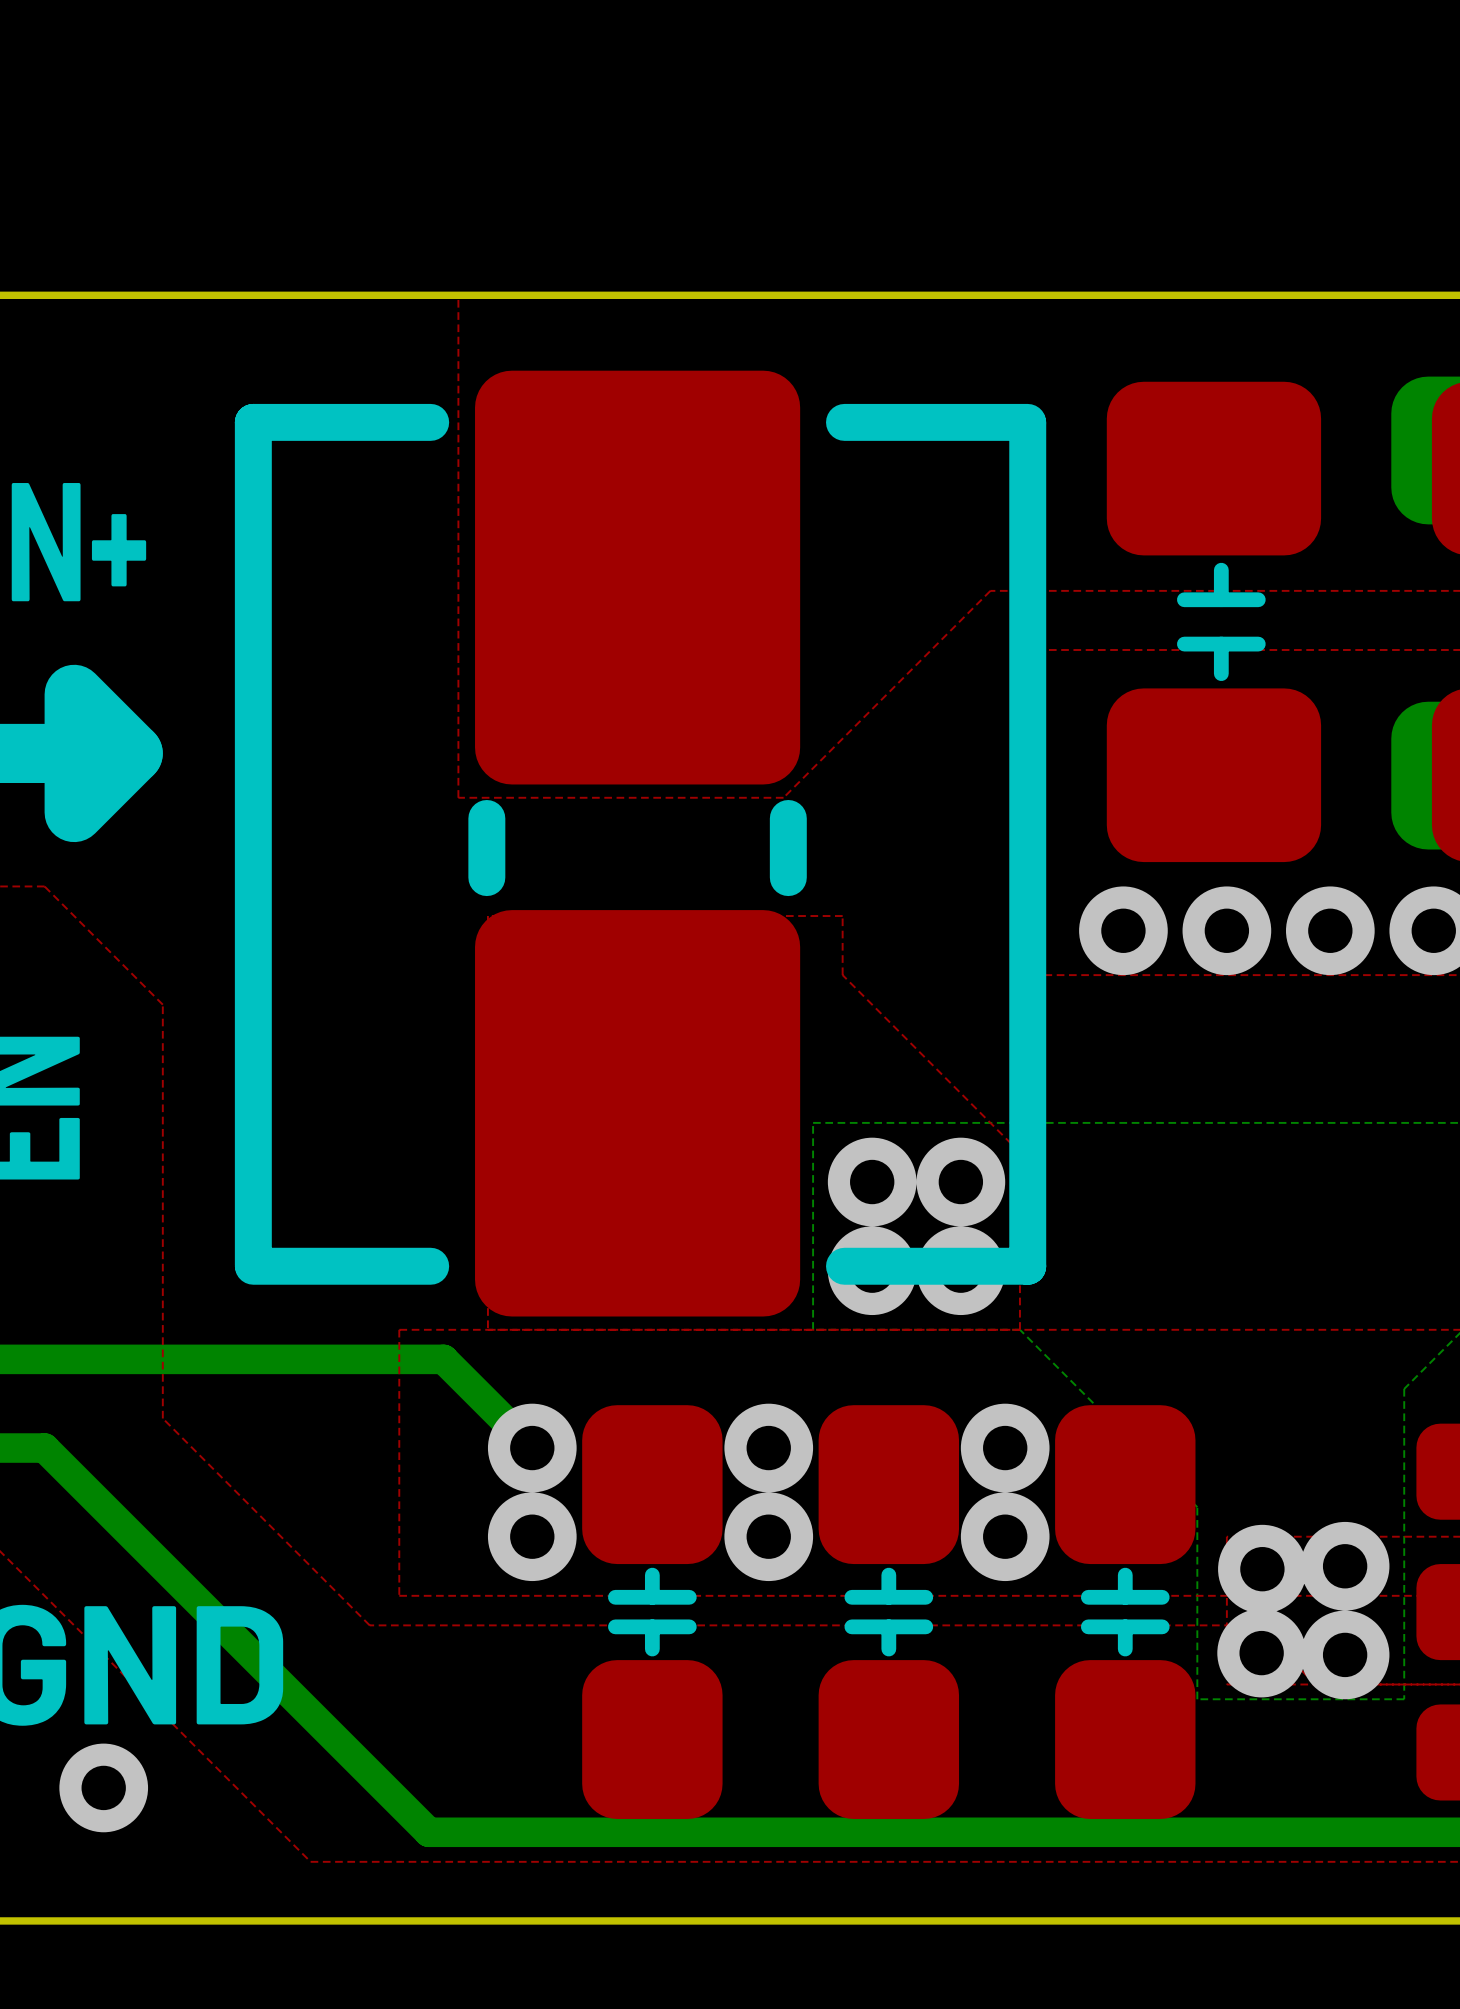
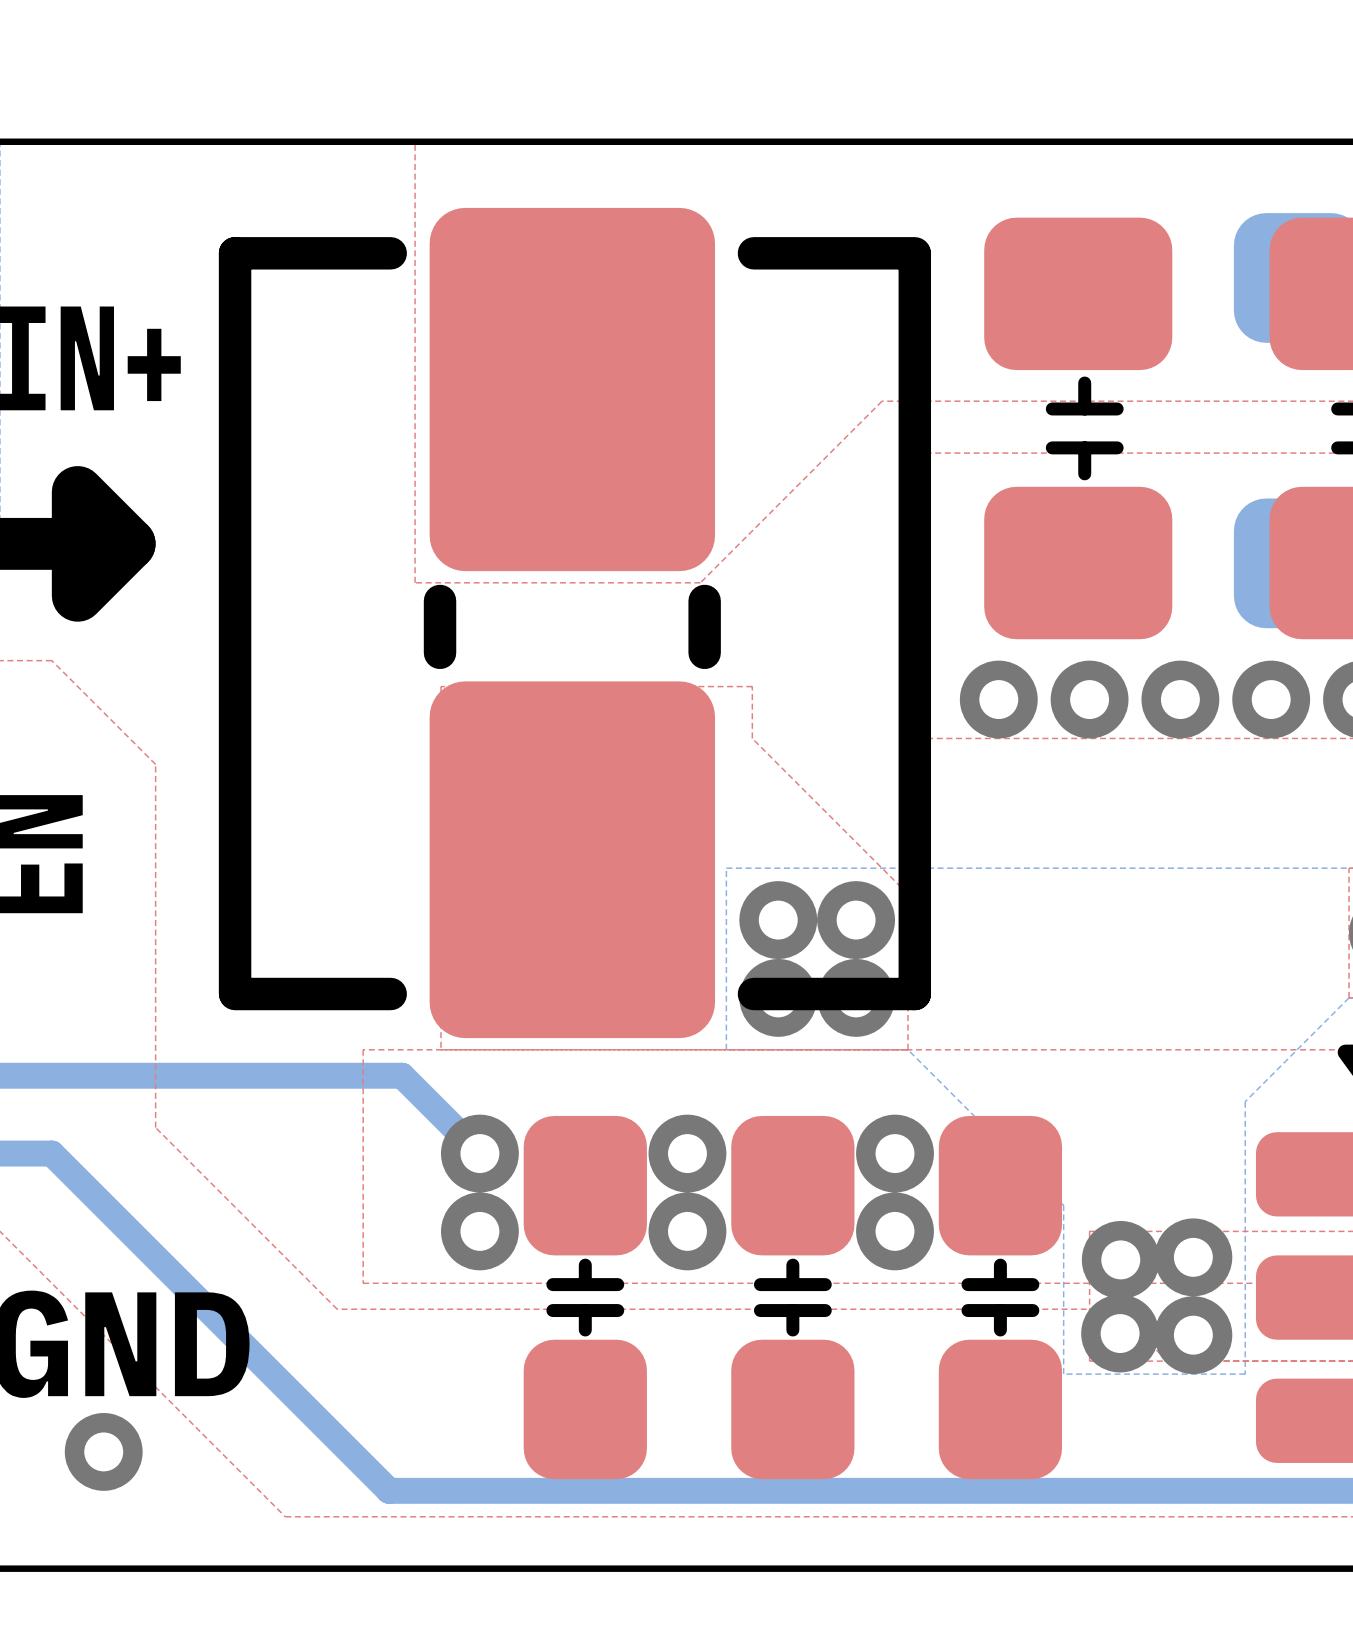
part footprint: [234, 370, 1047, 1317] -> [218, 207, 932, 1039]

